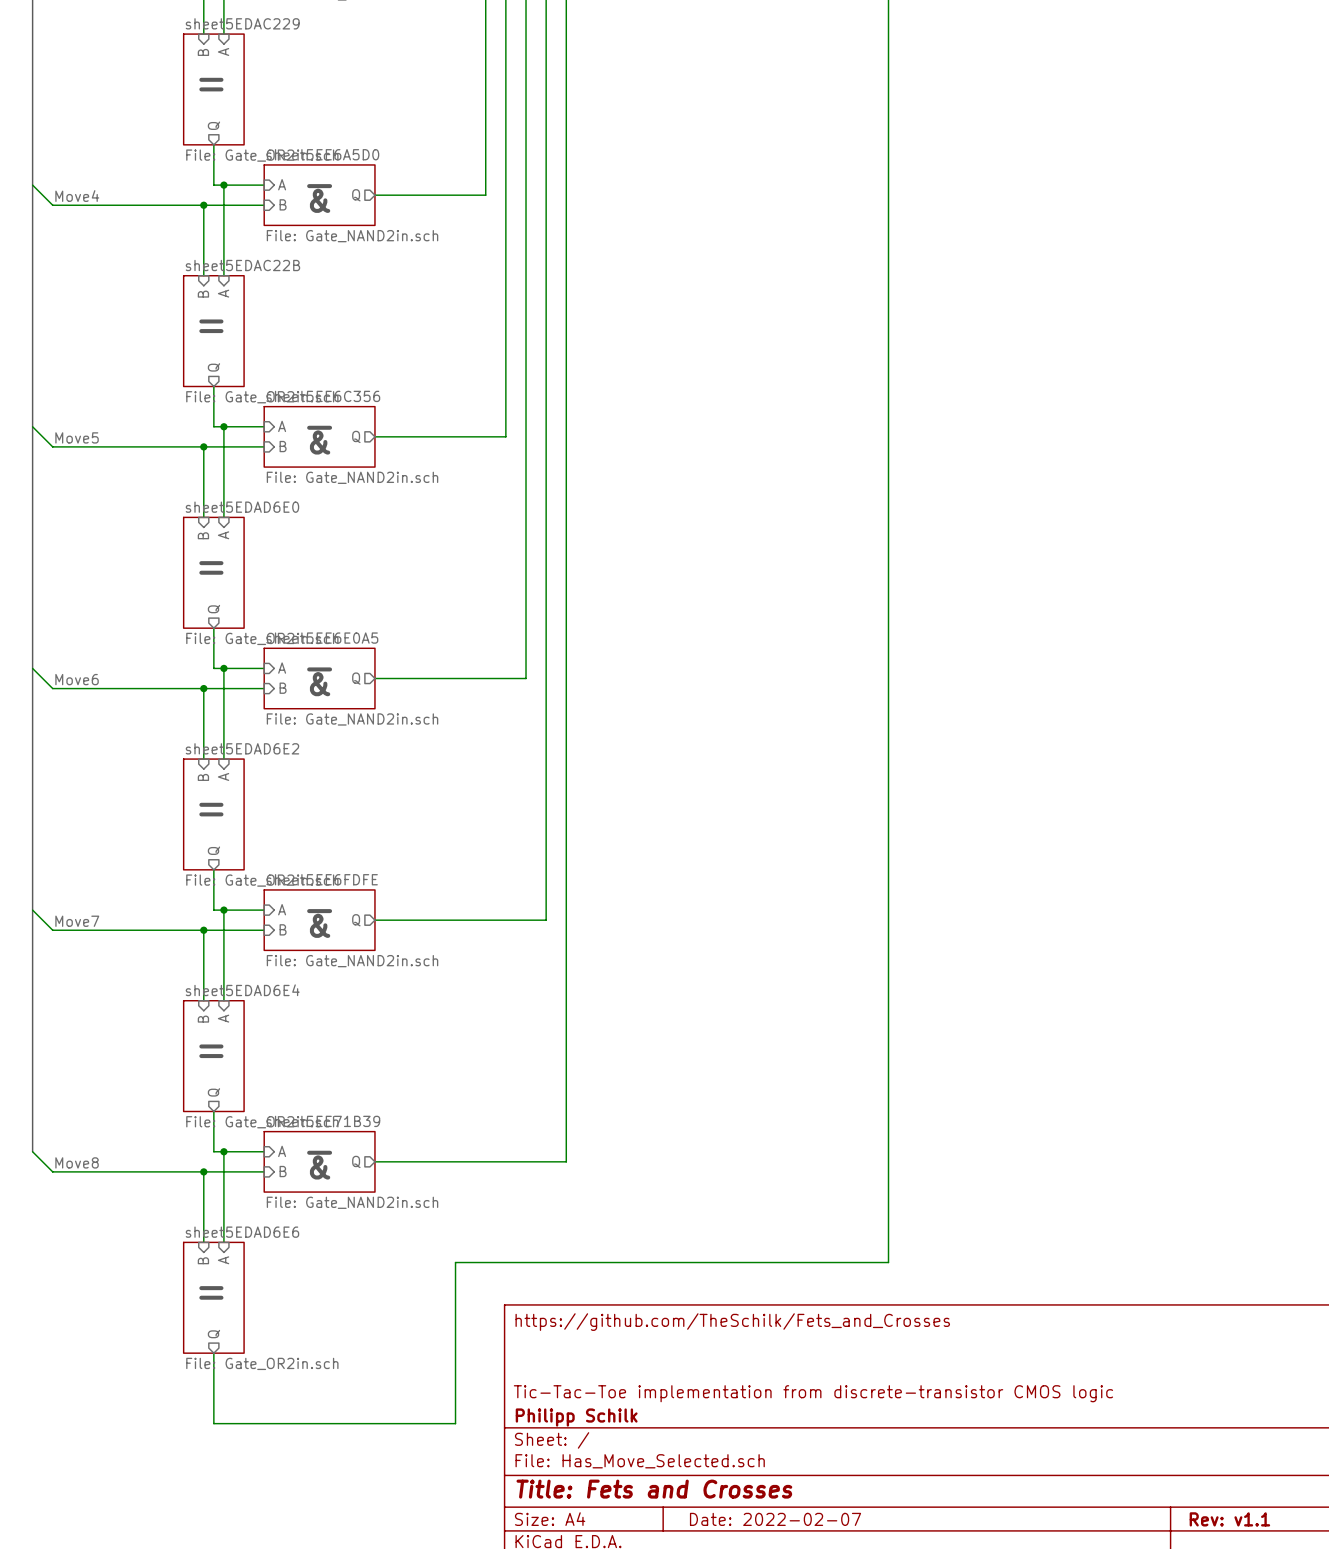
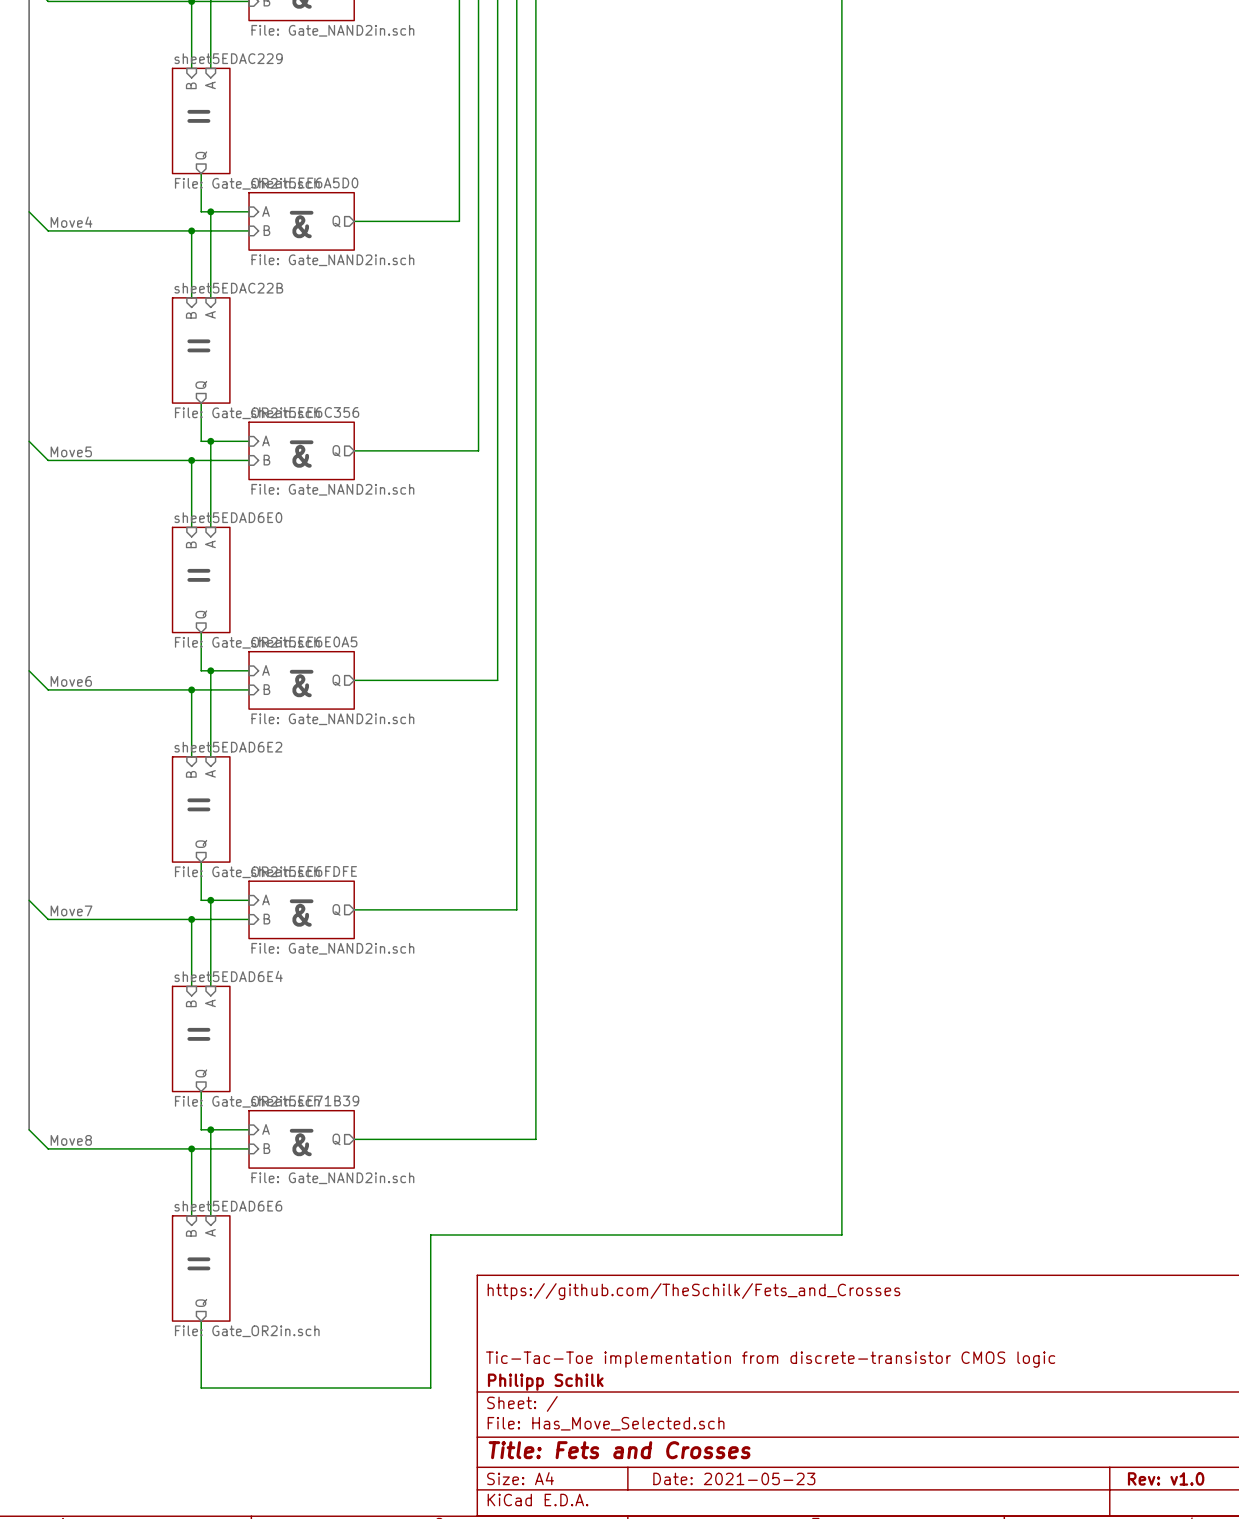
title block: Date: 2022-02-07 (775, 1519) -> Date: 2021-05-23 (734, 1478)
title block: Rev: v1.1 (1229, 1519) -> Rev: v1.0 (1166, 1478)

